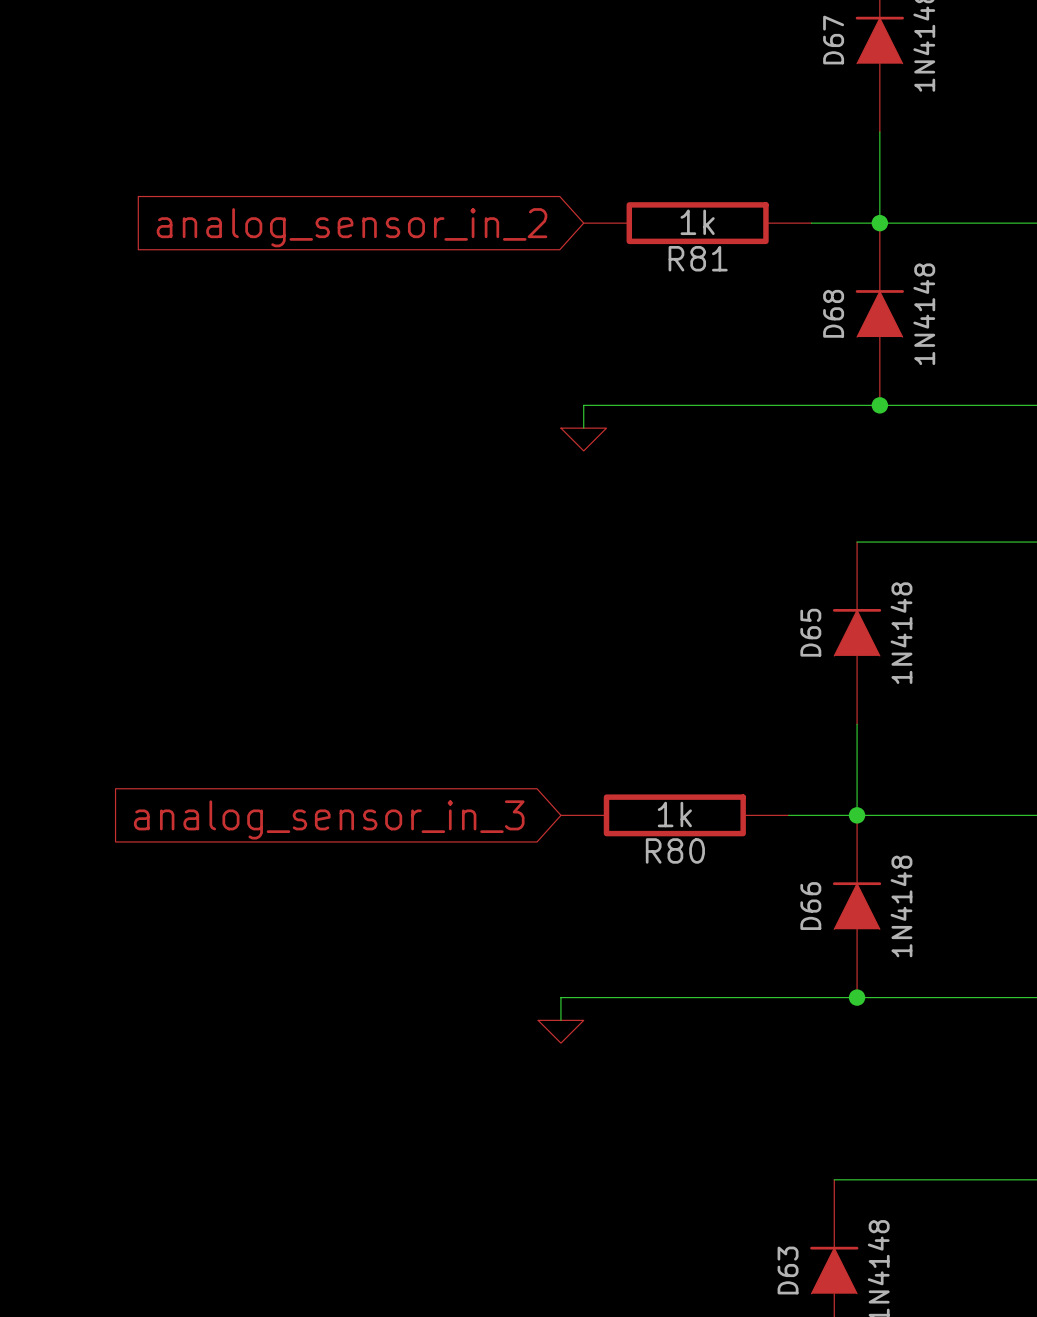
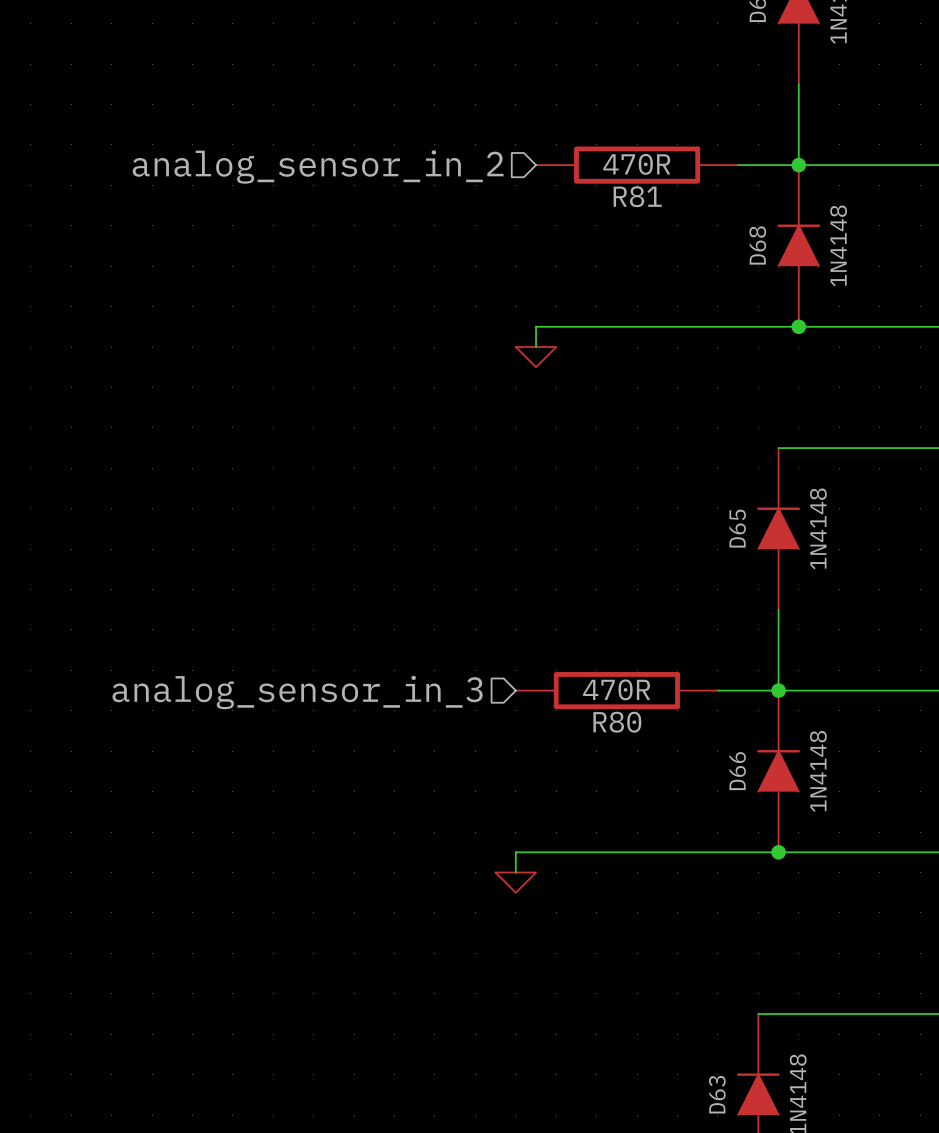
R81 value: 1k (697, 222) -> 470R (636, 164)
hierarchical label: none -> analog_sensor_in_2 (318, 167)
global label: analog_sensor_in_2 (352, 227) -> none
R80 value: 1k (674, 814) -> 470R (616, 689)
hierarchical label: none -> analog_sensor_in_3 (297, 692)
global label: analog_sensor_in_3 (329, 819) -> none

